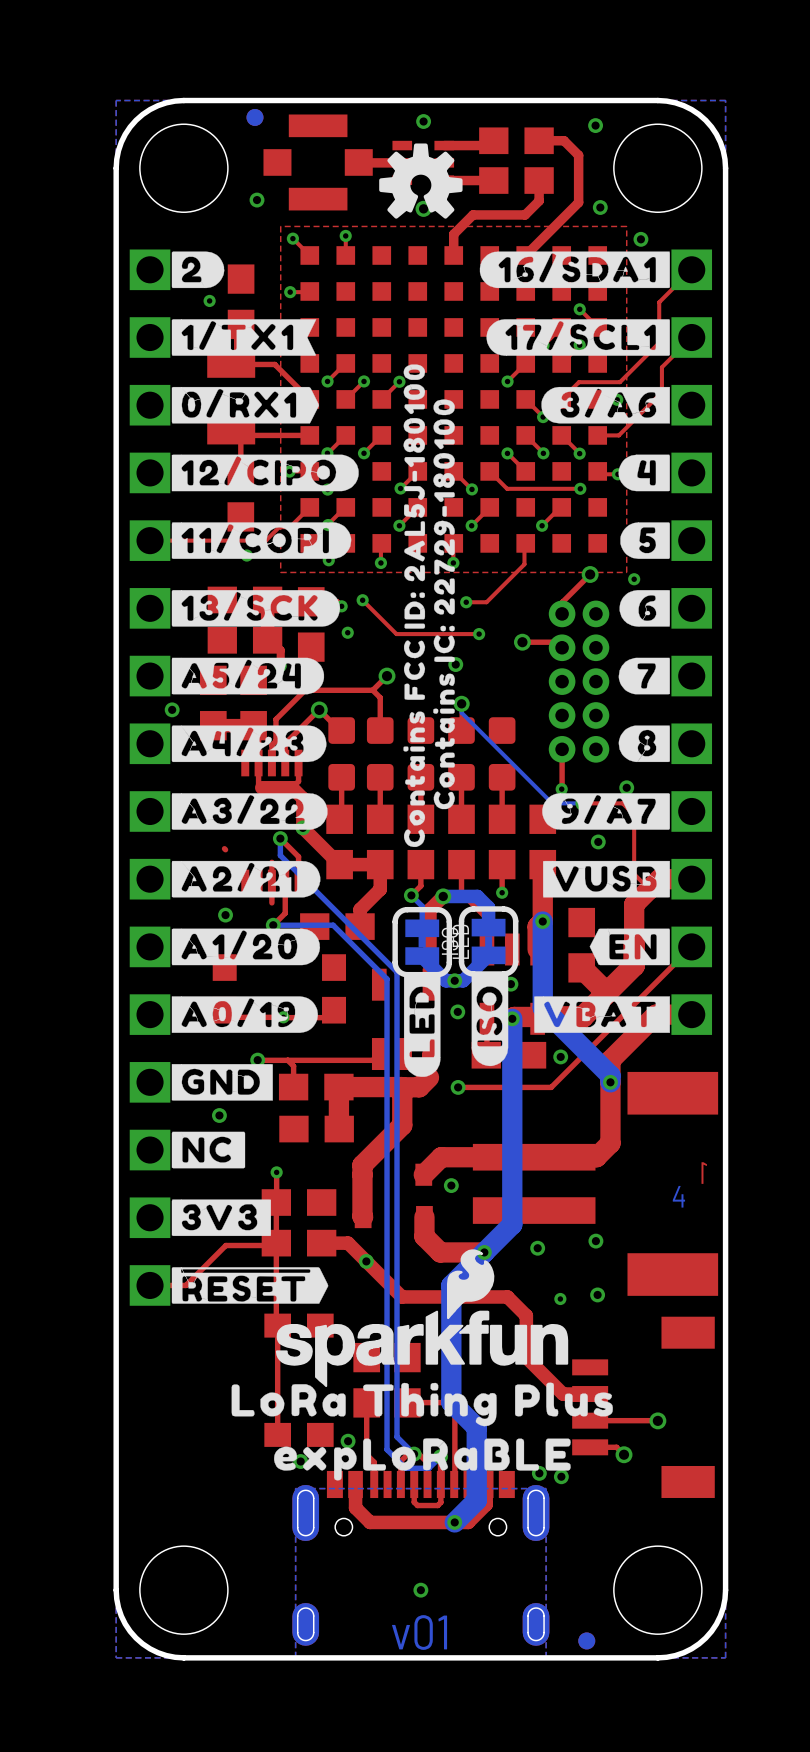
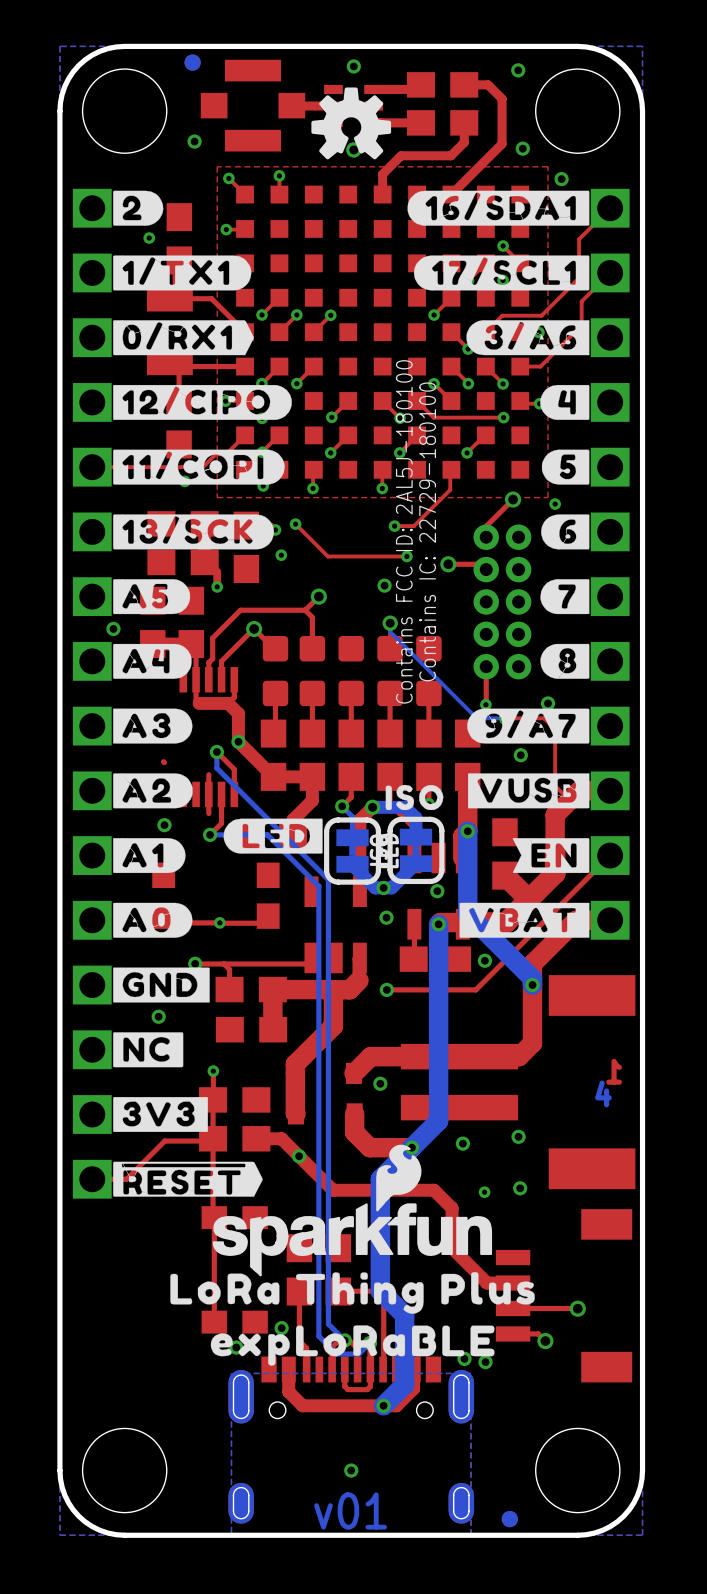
drawing shape: [171, 319, 317, 356] -> [113, 255, 252, 291]
drawing: [403, 364, 455, 848] -> none
text: none -> Contains FCC ID: 2AL5J-180100 (404, 531)
text: none -> Contains IC: 22729-180100 (427, 531)
drawing: [171, 657, 328, 1033] -> none
drawing: none -> [113, 579, 193, 938]
drawing: none -> [385, 784, 444, 811]
drawing: none -> [223, 818, 323, 854]
drawing shape: [589, 928, 670, 966] -> [512, 838, 590, 874]
drawing: [403, 972, 509, 1077] -> none

